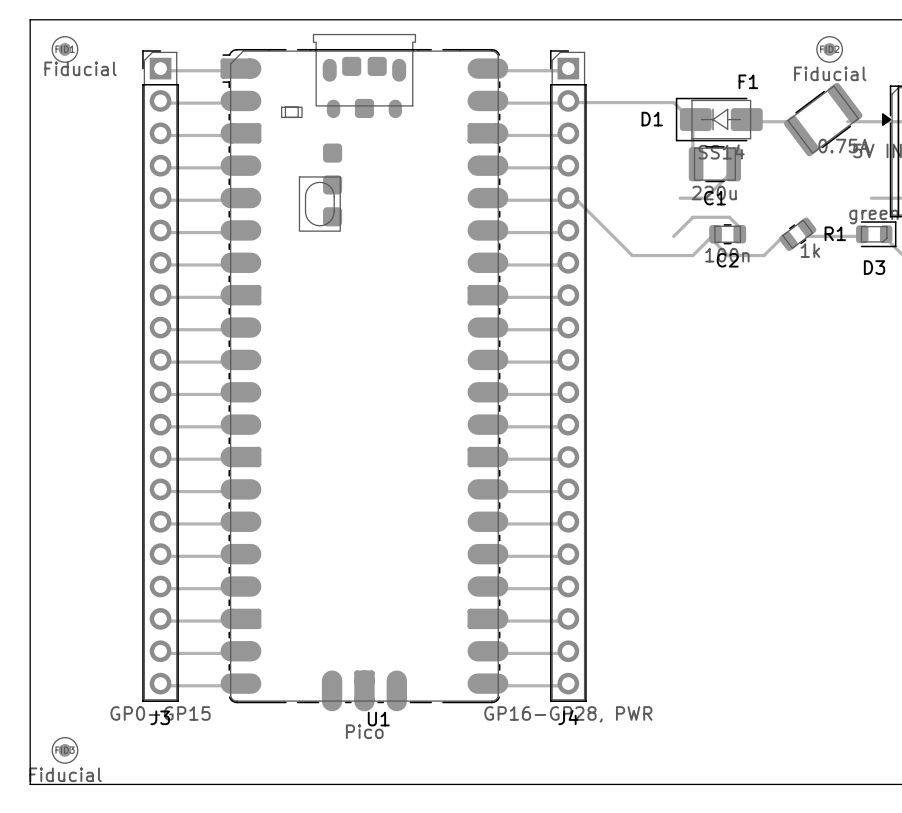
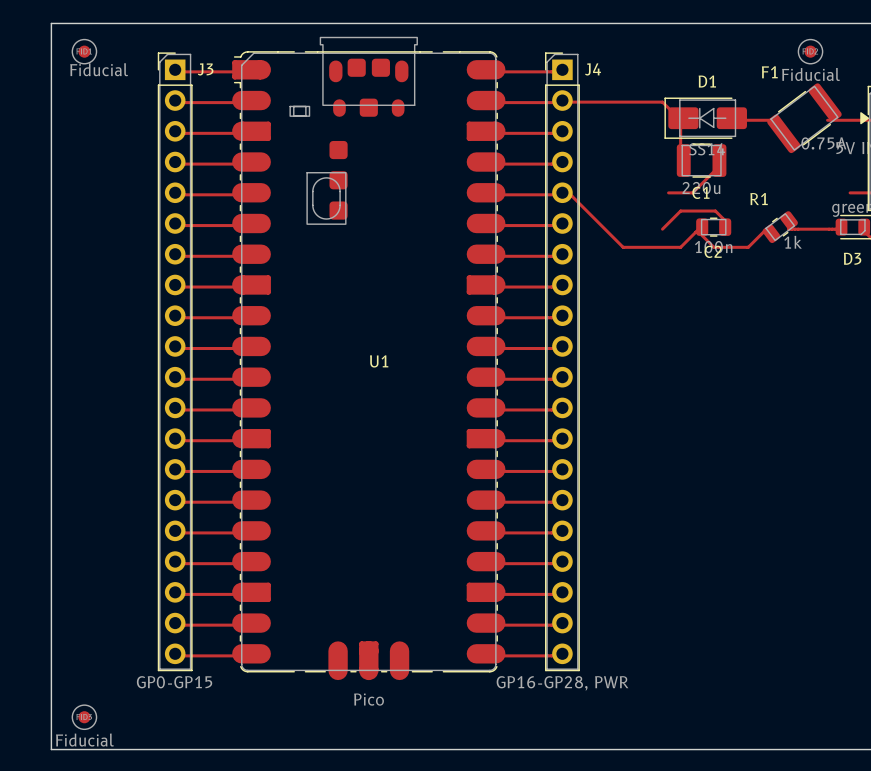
F1 name position: F1 (748, 81) -> F1 (769, 72)
D1 name position: D1 (652, 119) -> D1 (707, 81)
R1 name position: R1 (835, 233) -> R1 (759, 199)
J3 name position: J3 (160, 717) -> J3 (205, 69)
J4 name position: J4 (568, 717) -> J4 (593, 69)
U1 name position: U1 (378, 719) -> U1 (379, 361)

